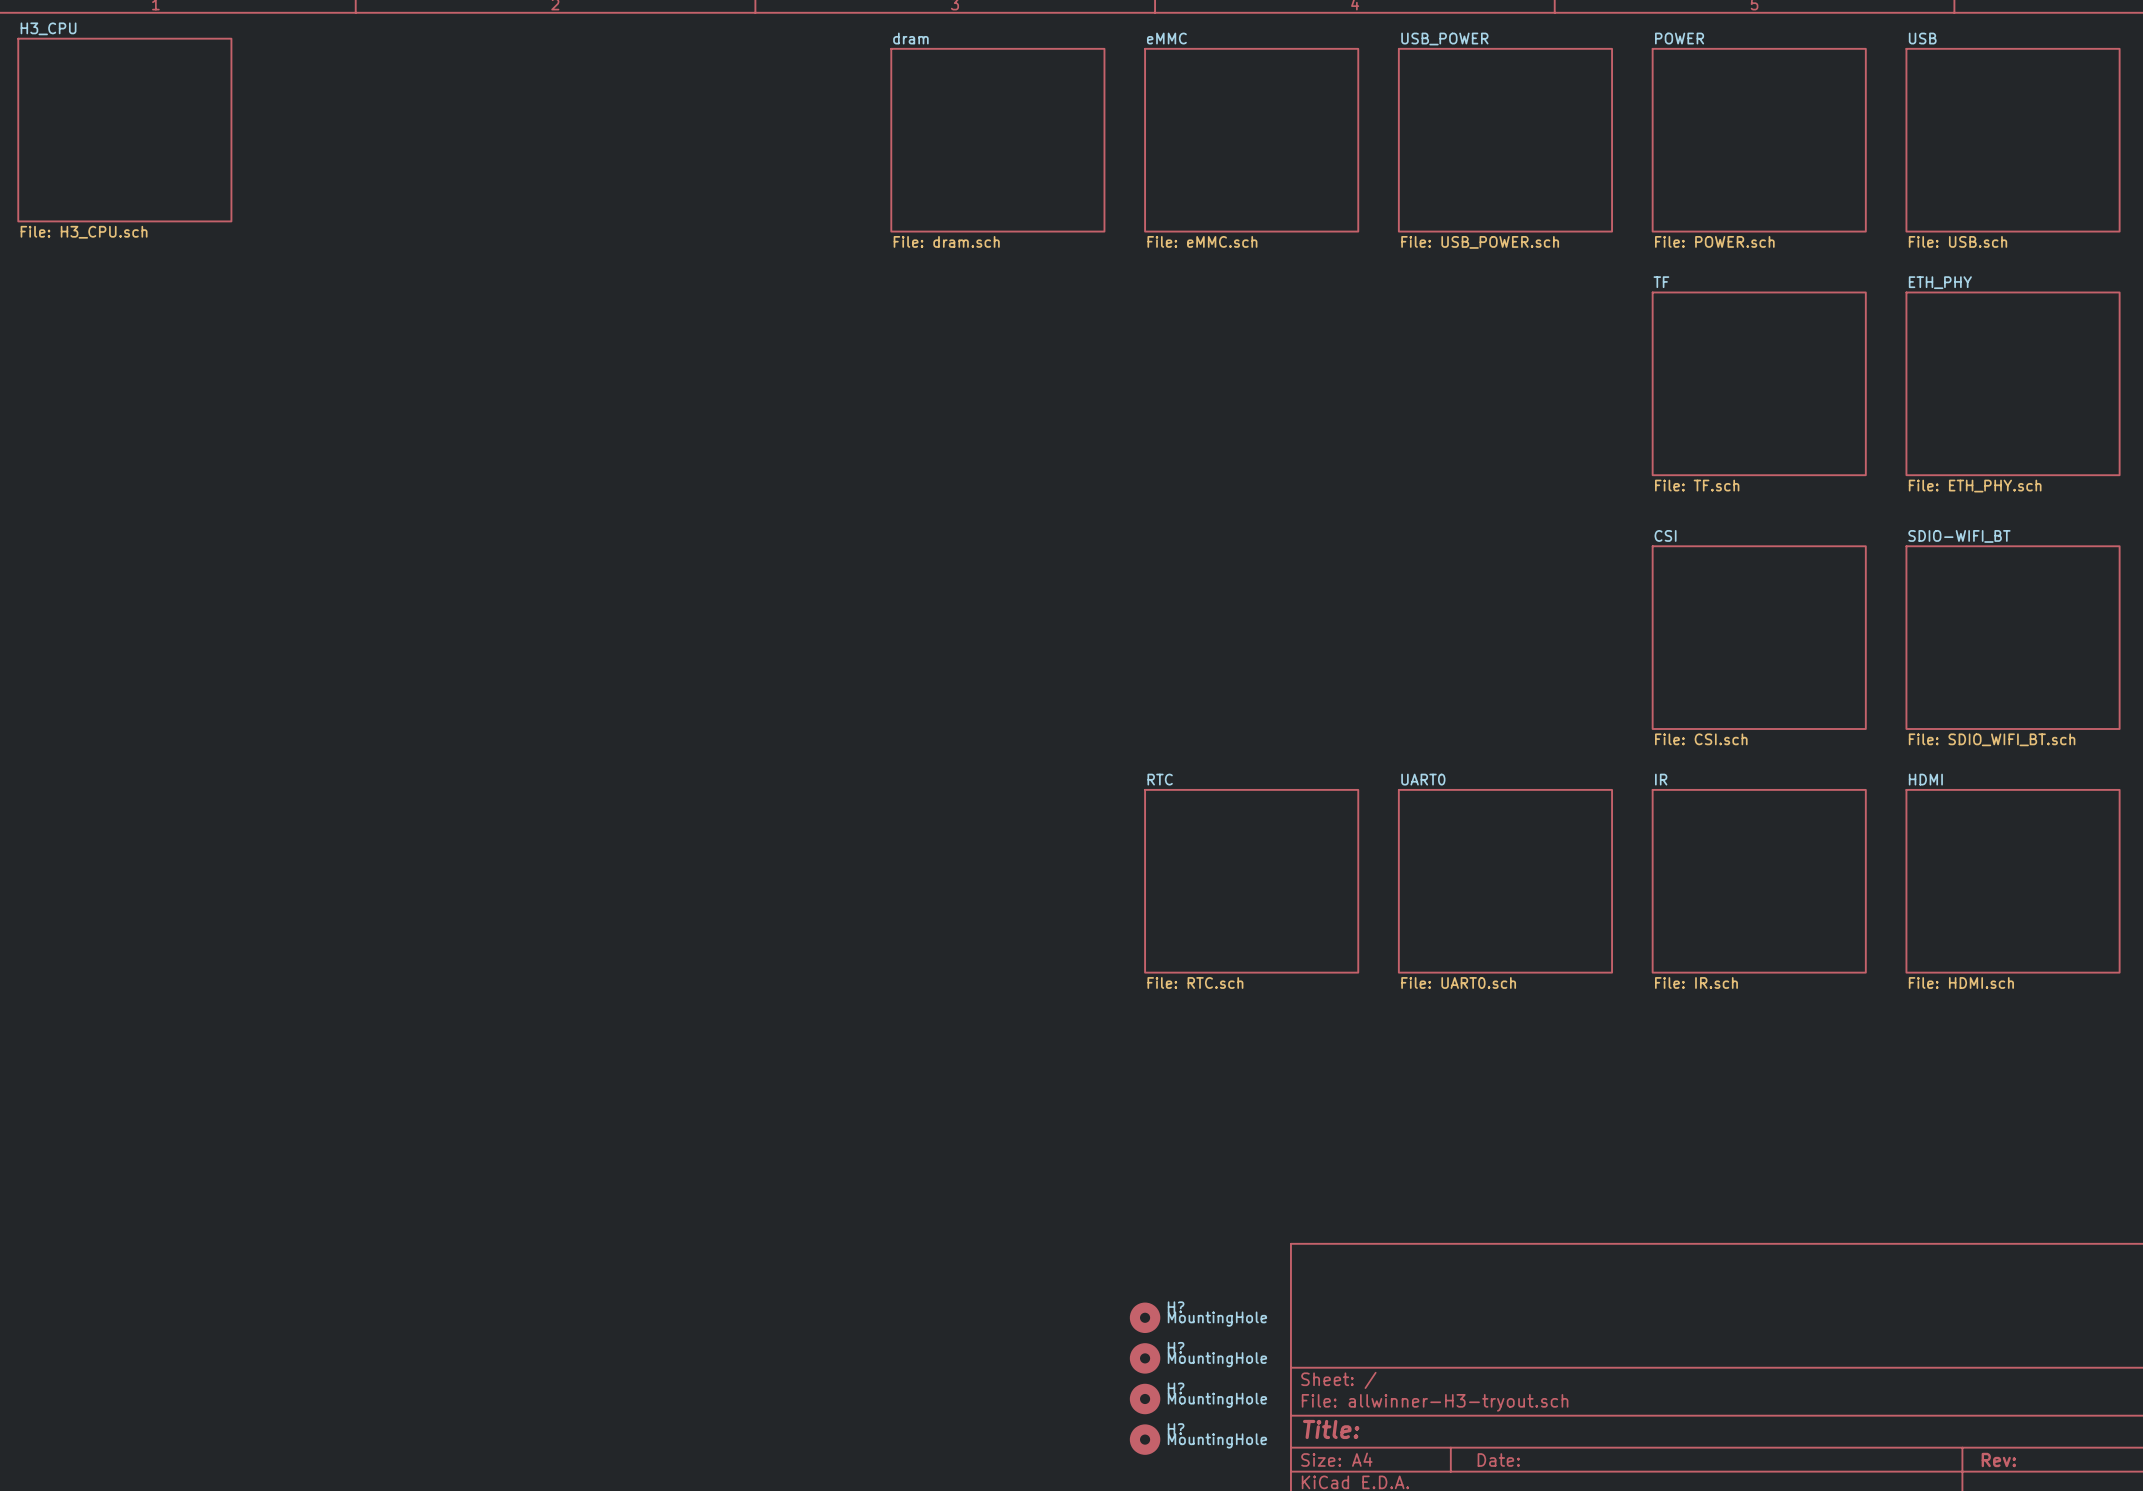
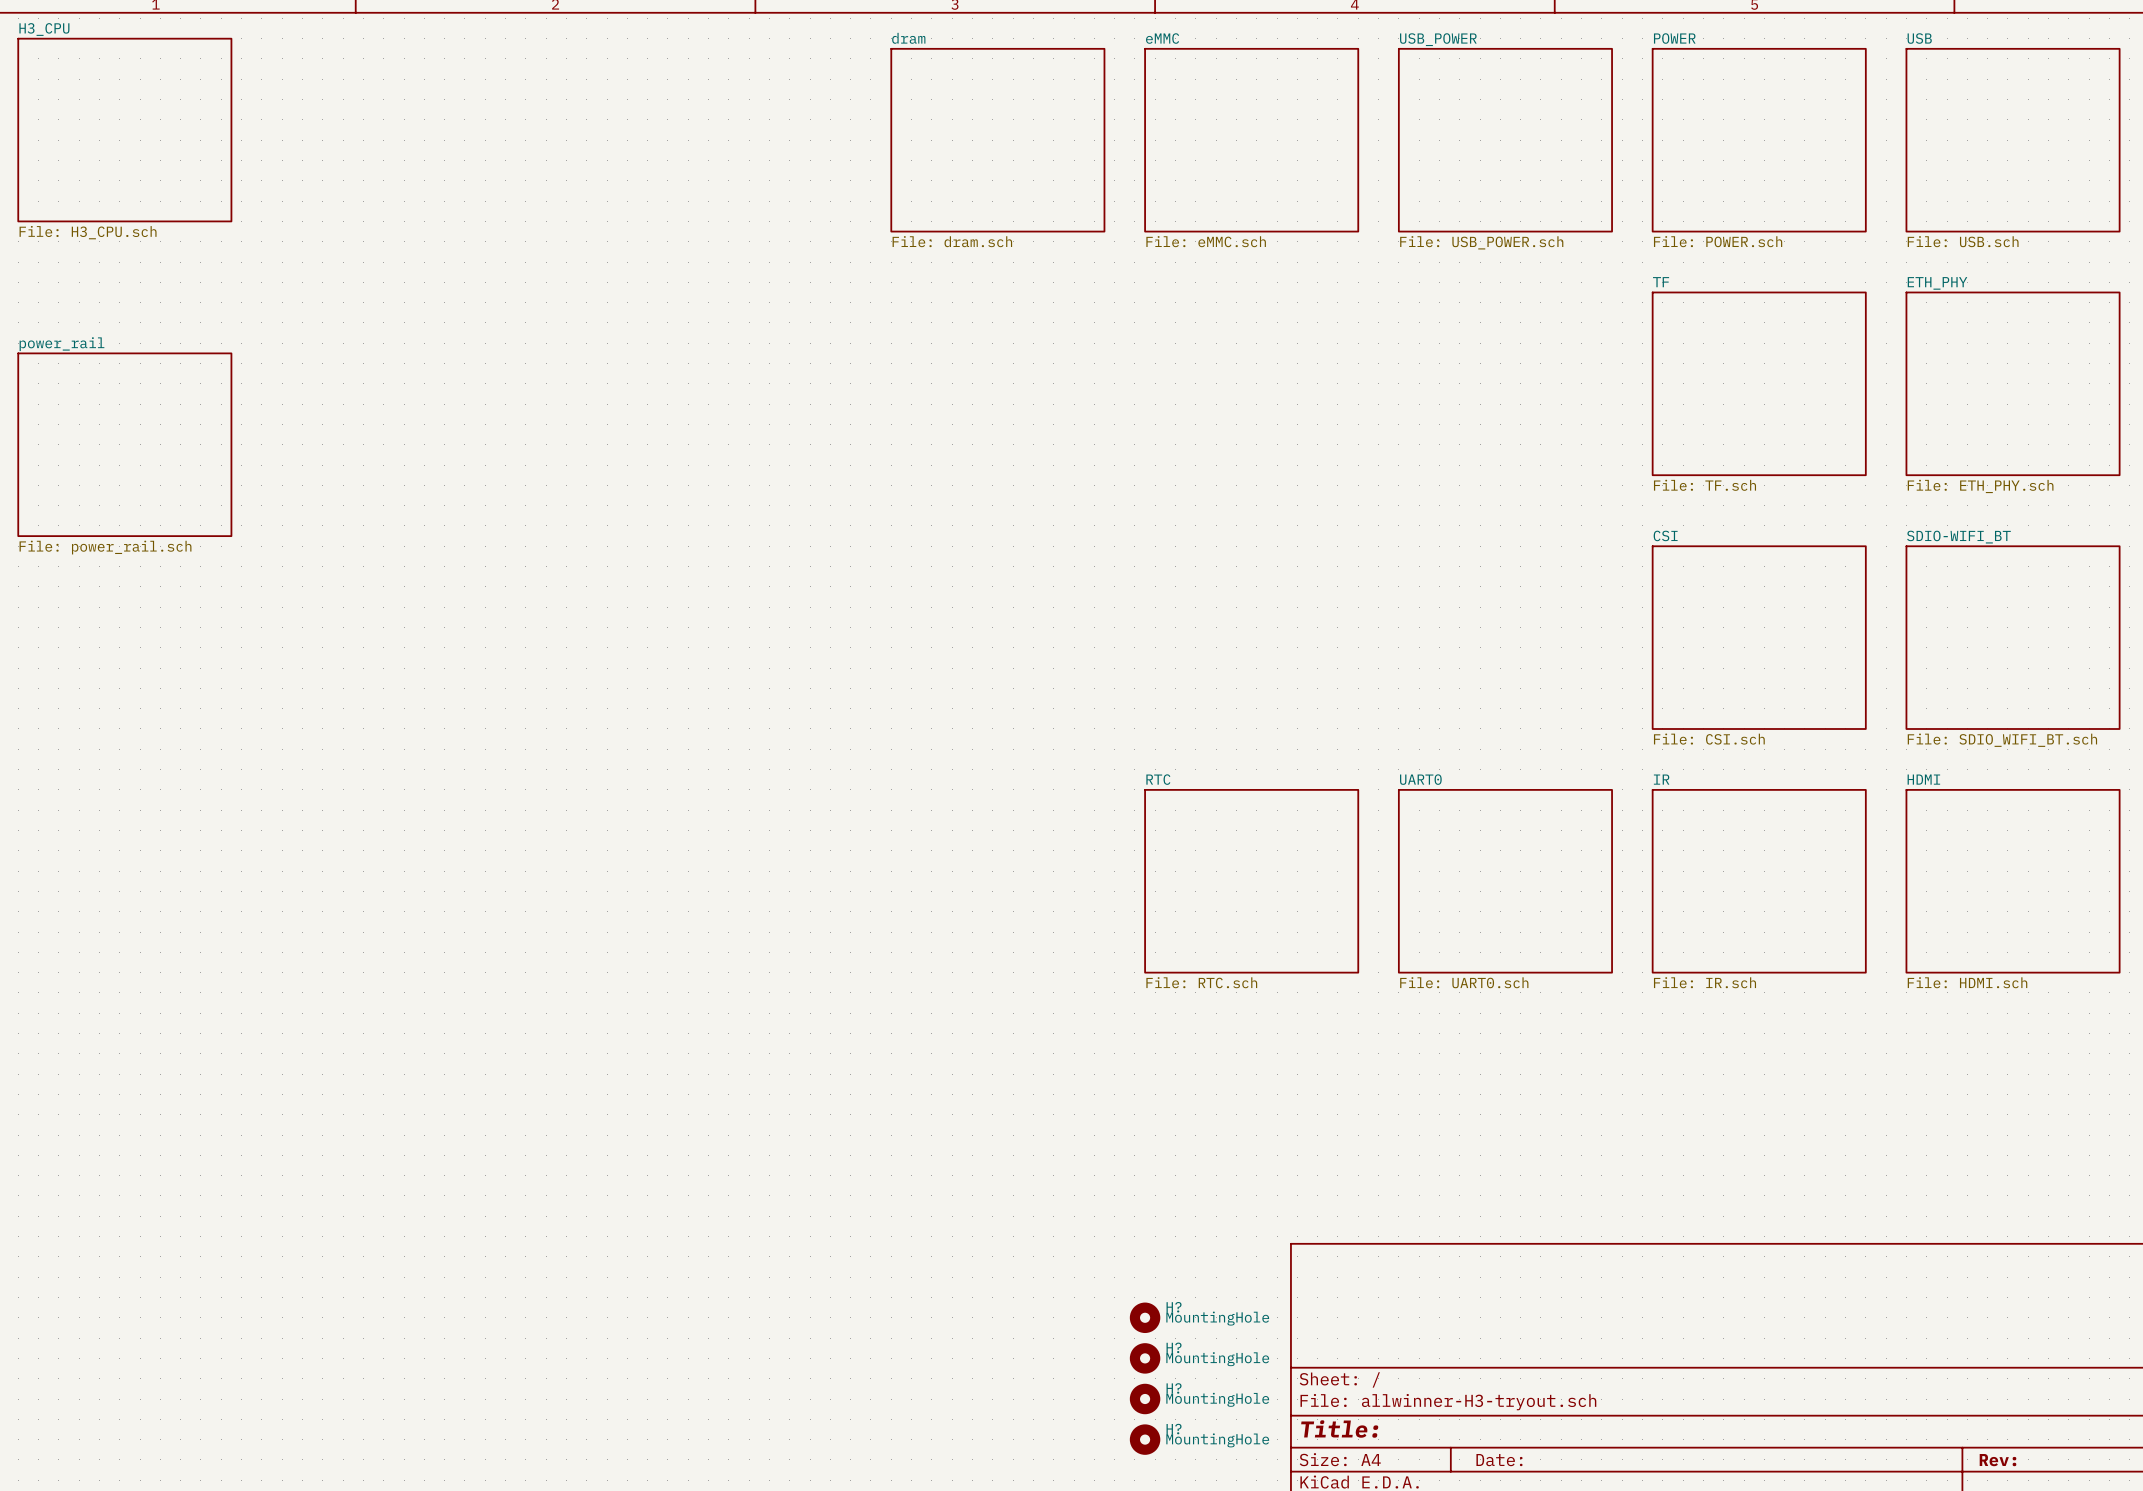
sheet power_rail: none -> File: power_rail.sch (124, 444)

